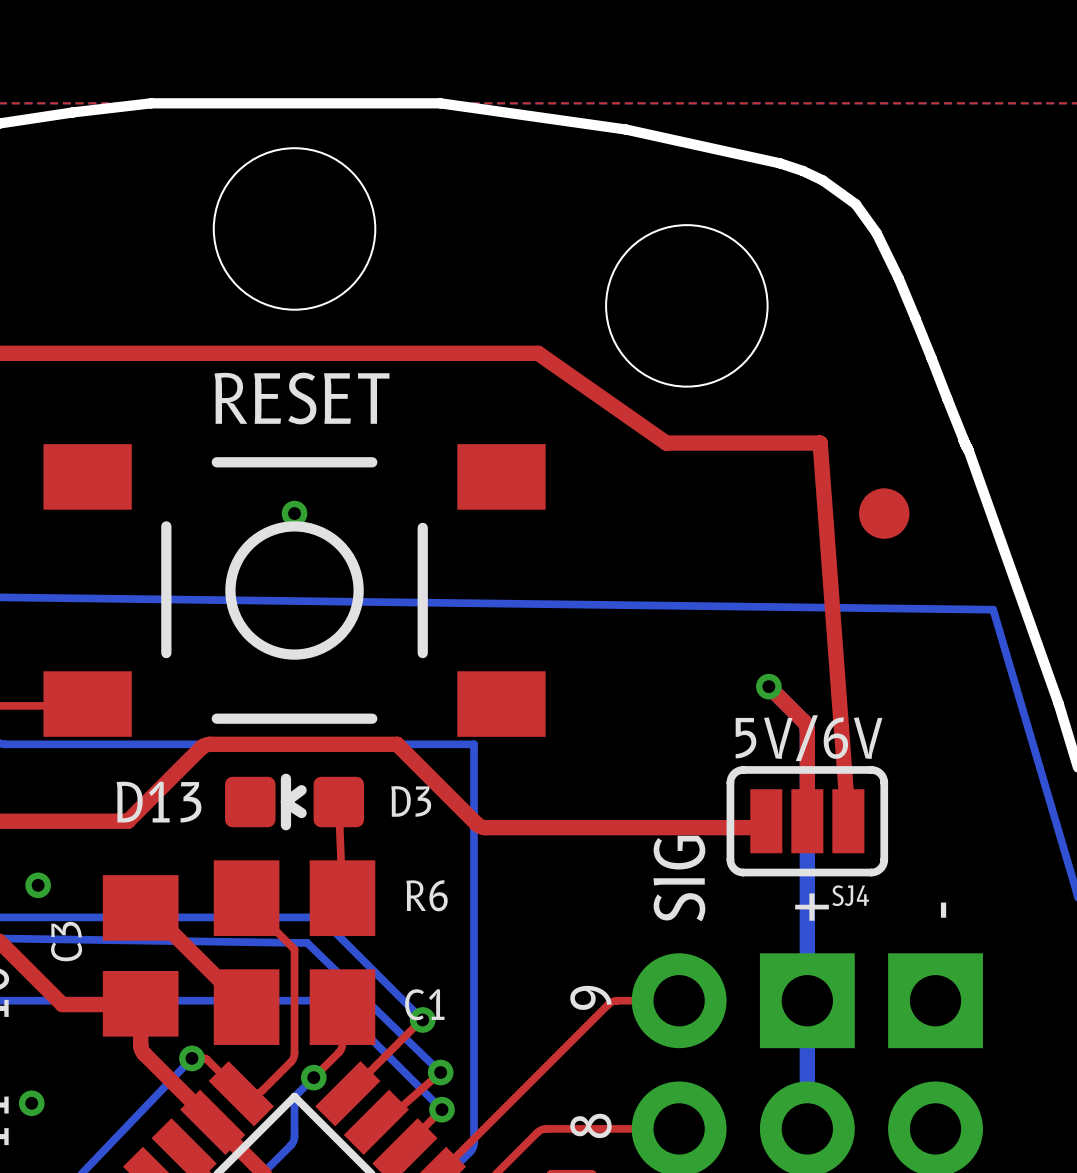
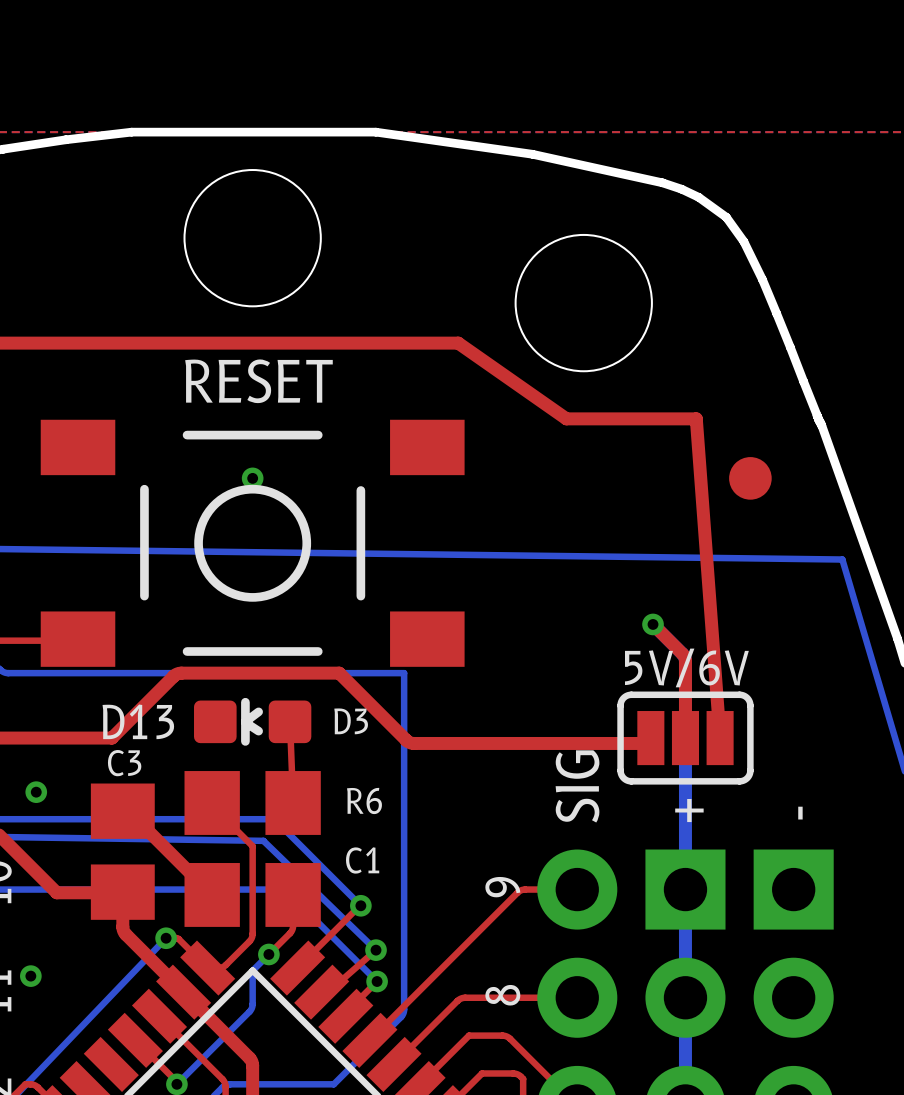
SJ4 name: SJ4 (850, 895) -> none
C3 name rotation: 0° (66, 941) -> 90° clockwise (124, 763)
C3 name position: C3 (66, 941) -> C3 (124, 763)
C1 name position: C1 (424, 1004) -> C1 (362, 860)

